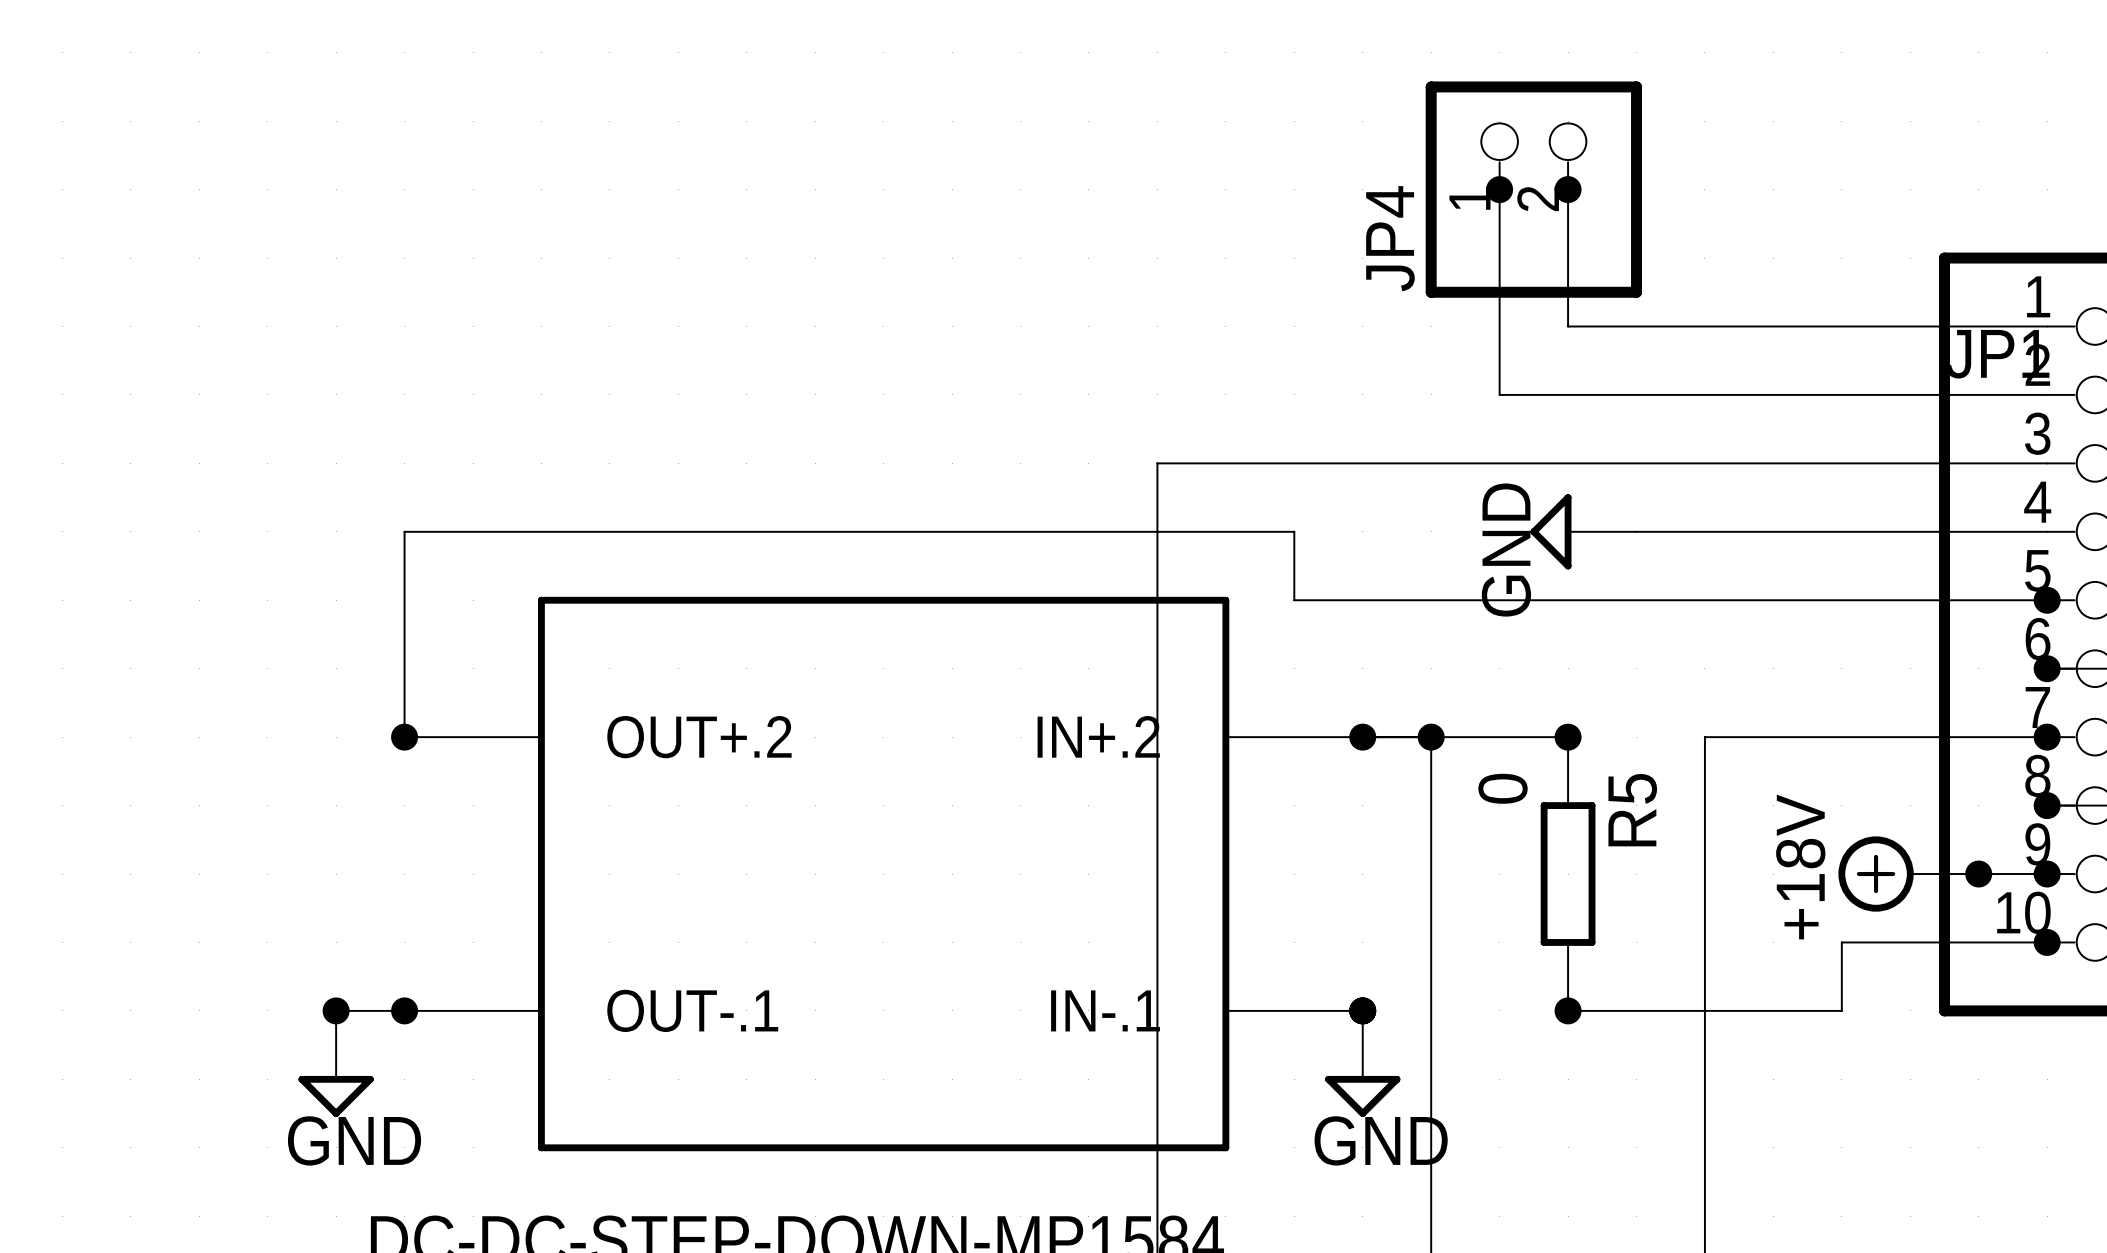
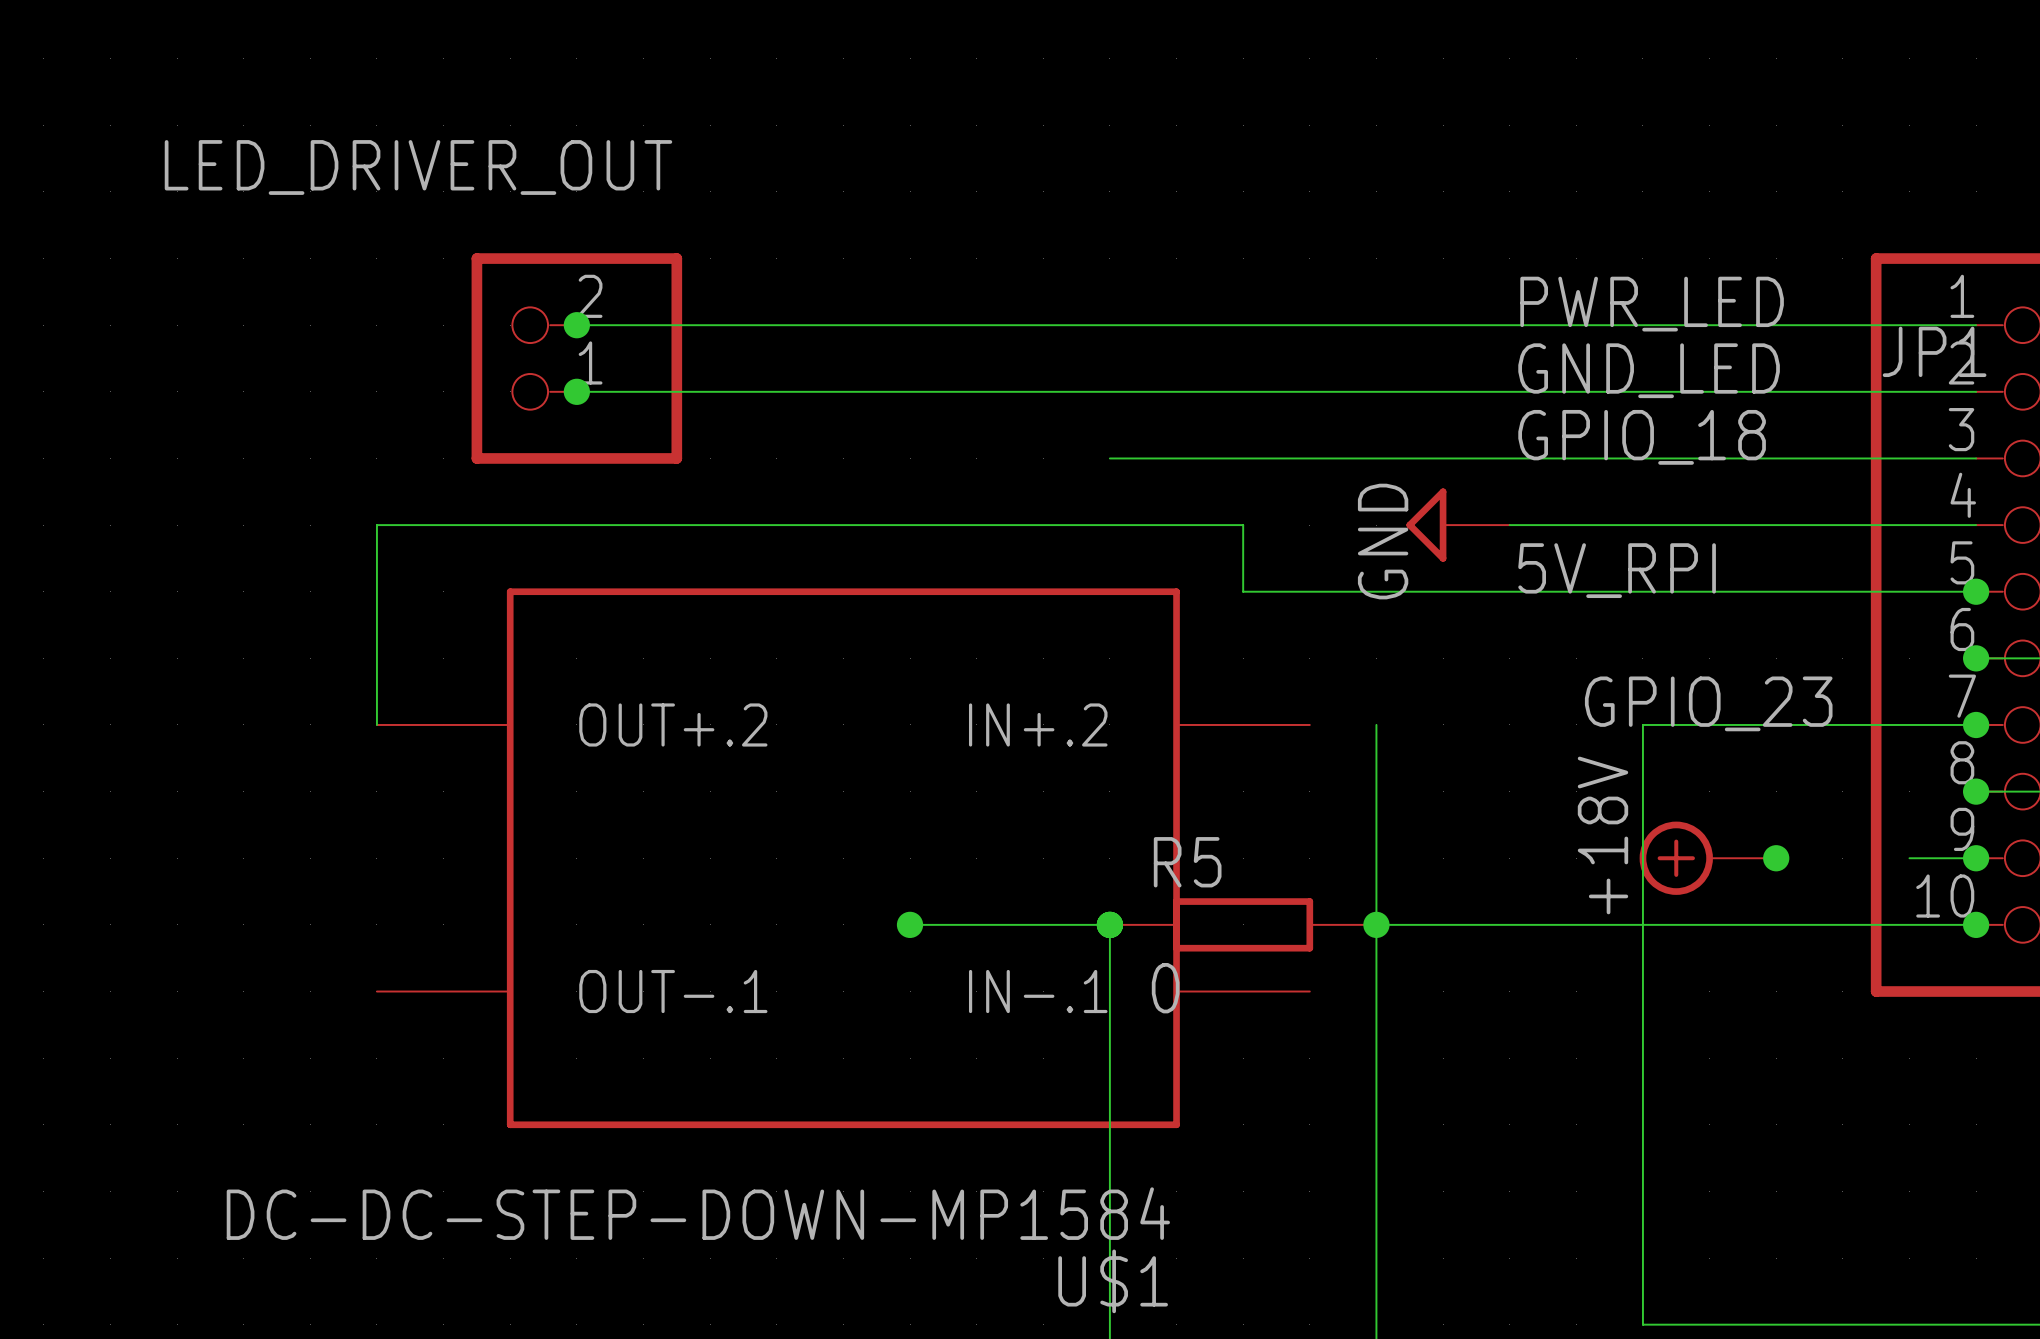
wire: (1499, 189) (1499, 394) -> (576, 391) (1443, 391)
junction: (1499, 189) -> none
JP4: (1533, 189) -> none
wire: (1568, 189) (1568, 326) -> (576, 325) (1509, 325)
junction: (1568, 189) -> none
label: none -> PWR_LED (1652, 304)
junction: none -> (576, 325)
LED_DRIVER_OUT: none -> (576, 358)
label: none -> GND_LED (1649, 370)
junction: none -> (576, 391)
label: none -> GPIO_18 (1642, 437)
wire: (1157, 463) (1157, 942) -> (910, 924) (1109, 924)
power symbol position: GND (1583, 531) -> GND (1458, 525)
label: none -> 5V_RPI (1617, 570)
label: none -> GPIO_23 (1708, 703)
junction: (404, 737) -> none
wire: (1362, 737) (1568, 737) -> none
junction: (1362, 737) -> none
junction: (1431, 737) -> none
junction: (1568, 737) -> none
R5 value position: 0 (1503, 788) -> 0 (1165, 988)
R5 name position: R5 (1632, 810) -> R5 (1187, 862)
R5 rotation: 0° (1568, 874) -> 90° clockwise (1243, 924)
R5 position: (1568, 874) -> (1243, 924)
power symbol position: +18V (1908, 874) -> +18V (1707, 858)
junction position: (1978, 874) -> (1776, 858)
junction: none -> (910, 924)
junction: none -> (1109, 924)
junction: none -> (1376, 924)
wire: (1841, 942) (1841, 1010) (1568, 1010) -> (1776, 924) (1376, 924)
wire: (336, 1010) (404, 1010) -> none
junction: (336, 1010) -> none
junction: (404, 1010) -> none
junction: (1362, 1010) -> none
junction: (1568, 1010) -> none
power symbol: GND (336, 1063) -> none
power symbol: GND (1362, 1063) -> none

